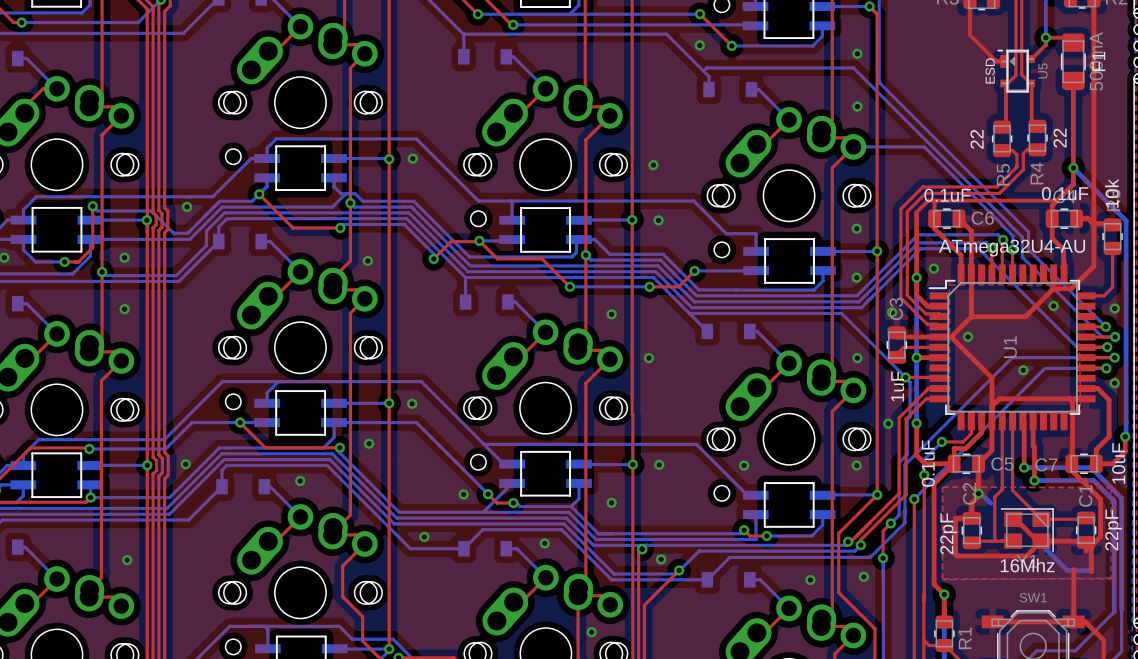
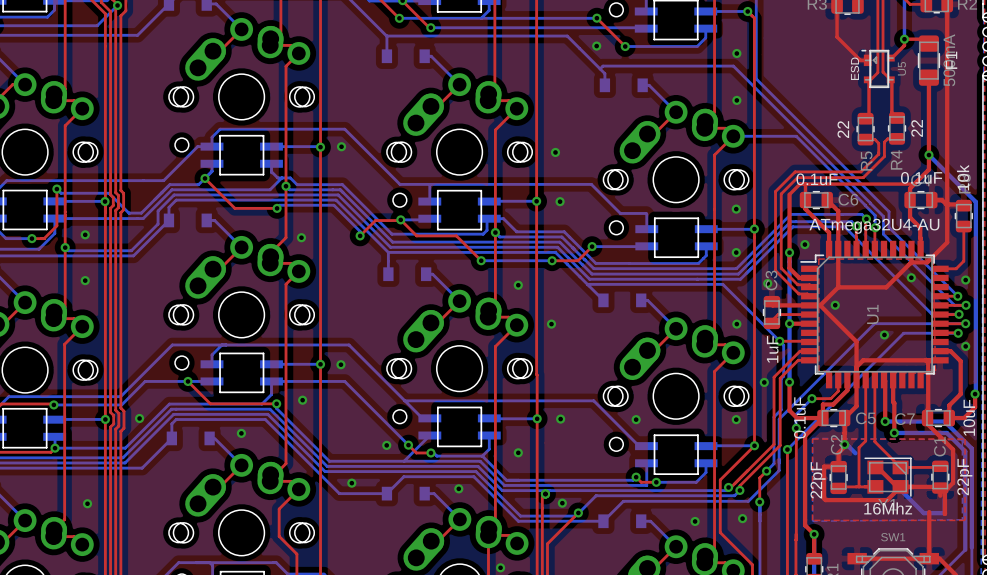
via: (187, 206) -> none

